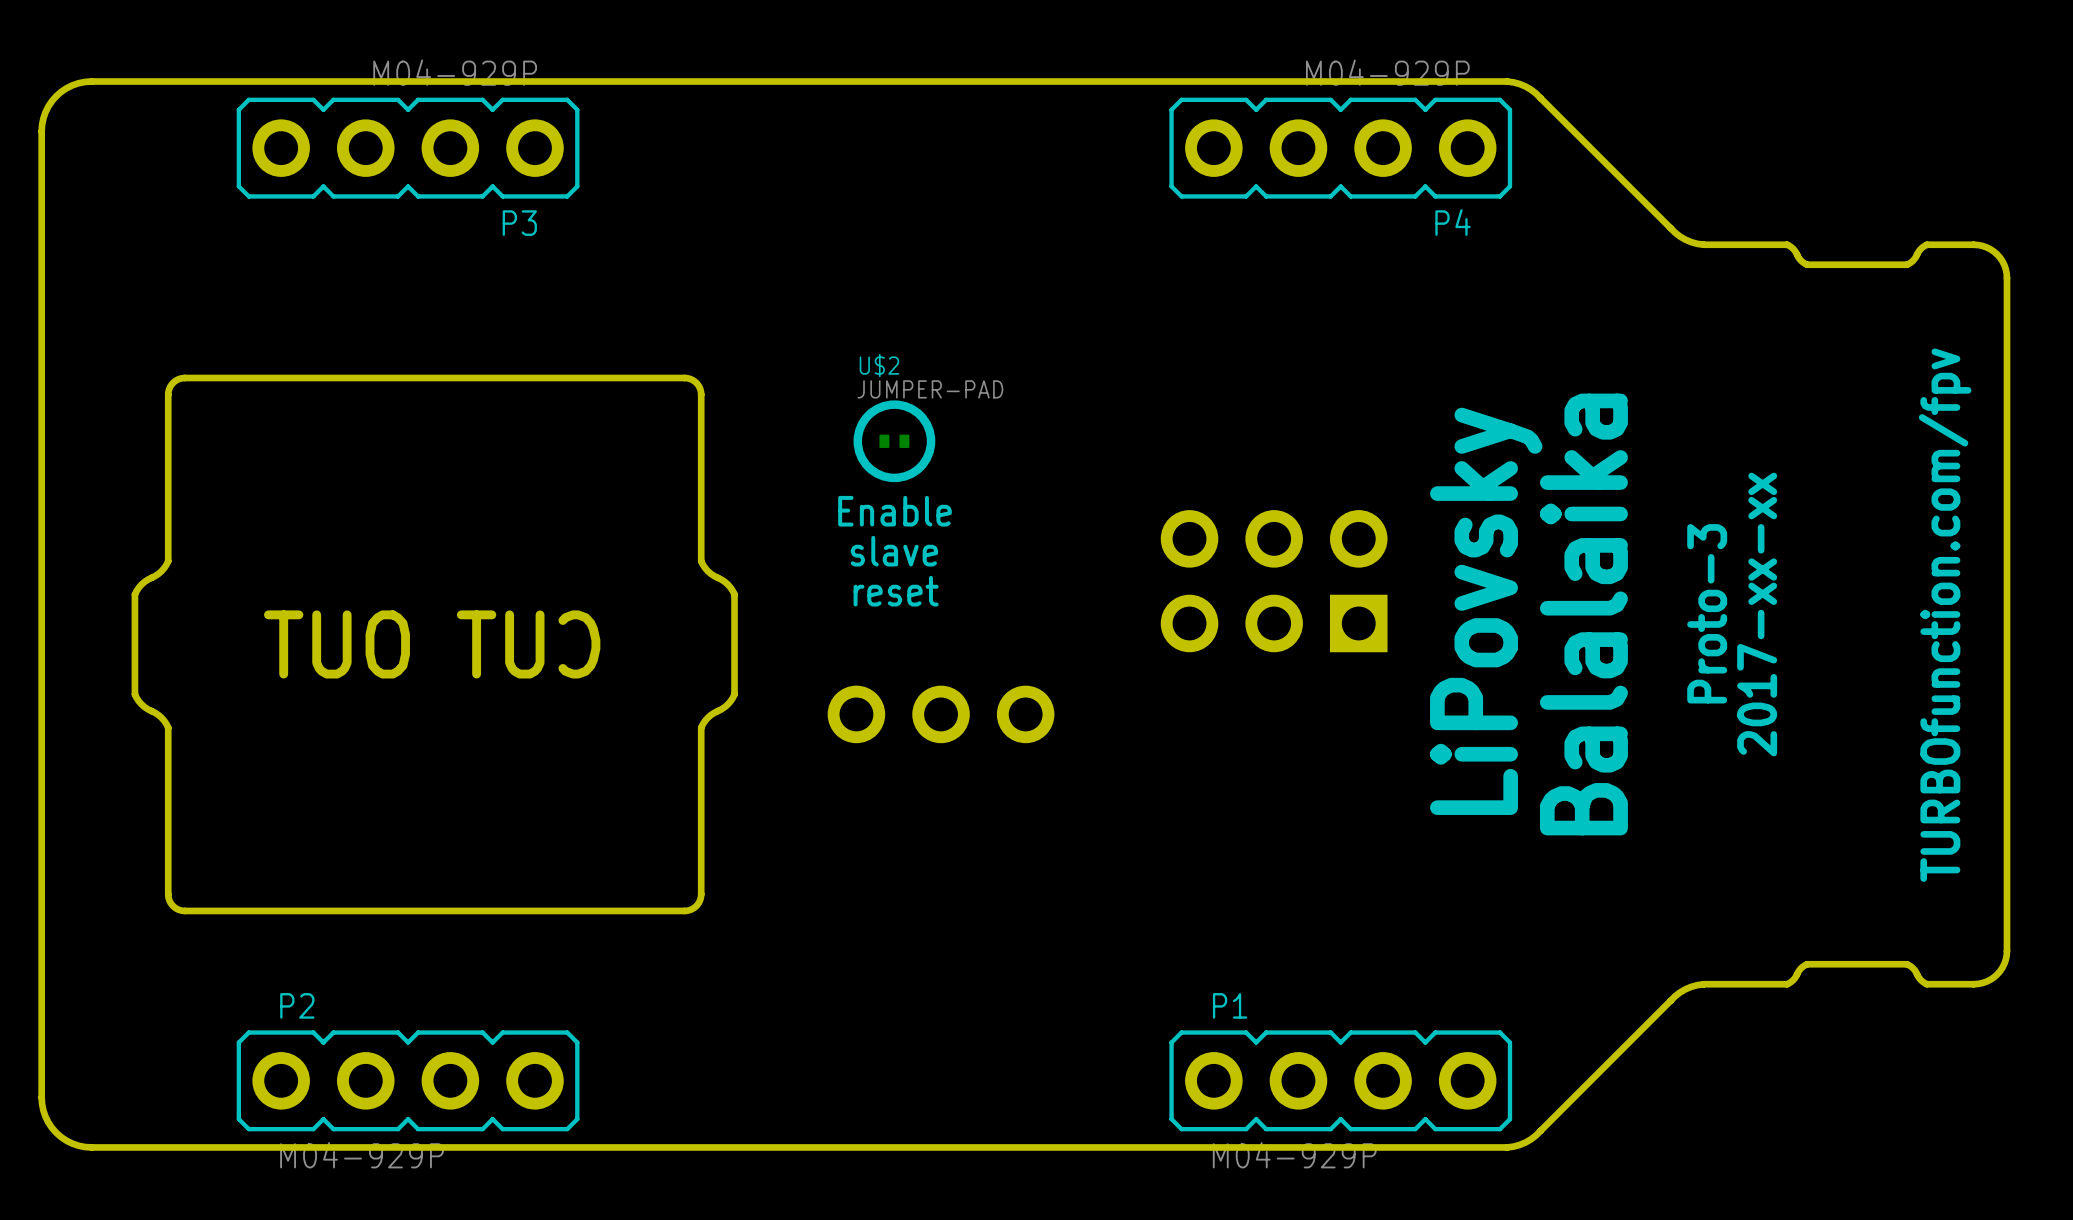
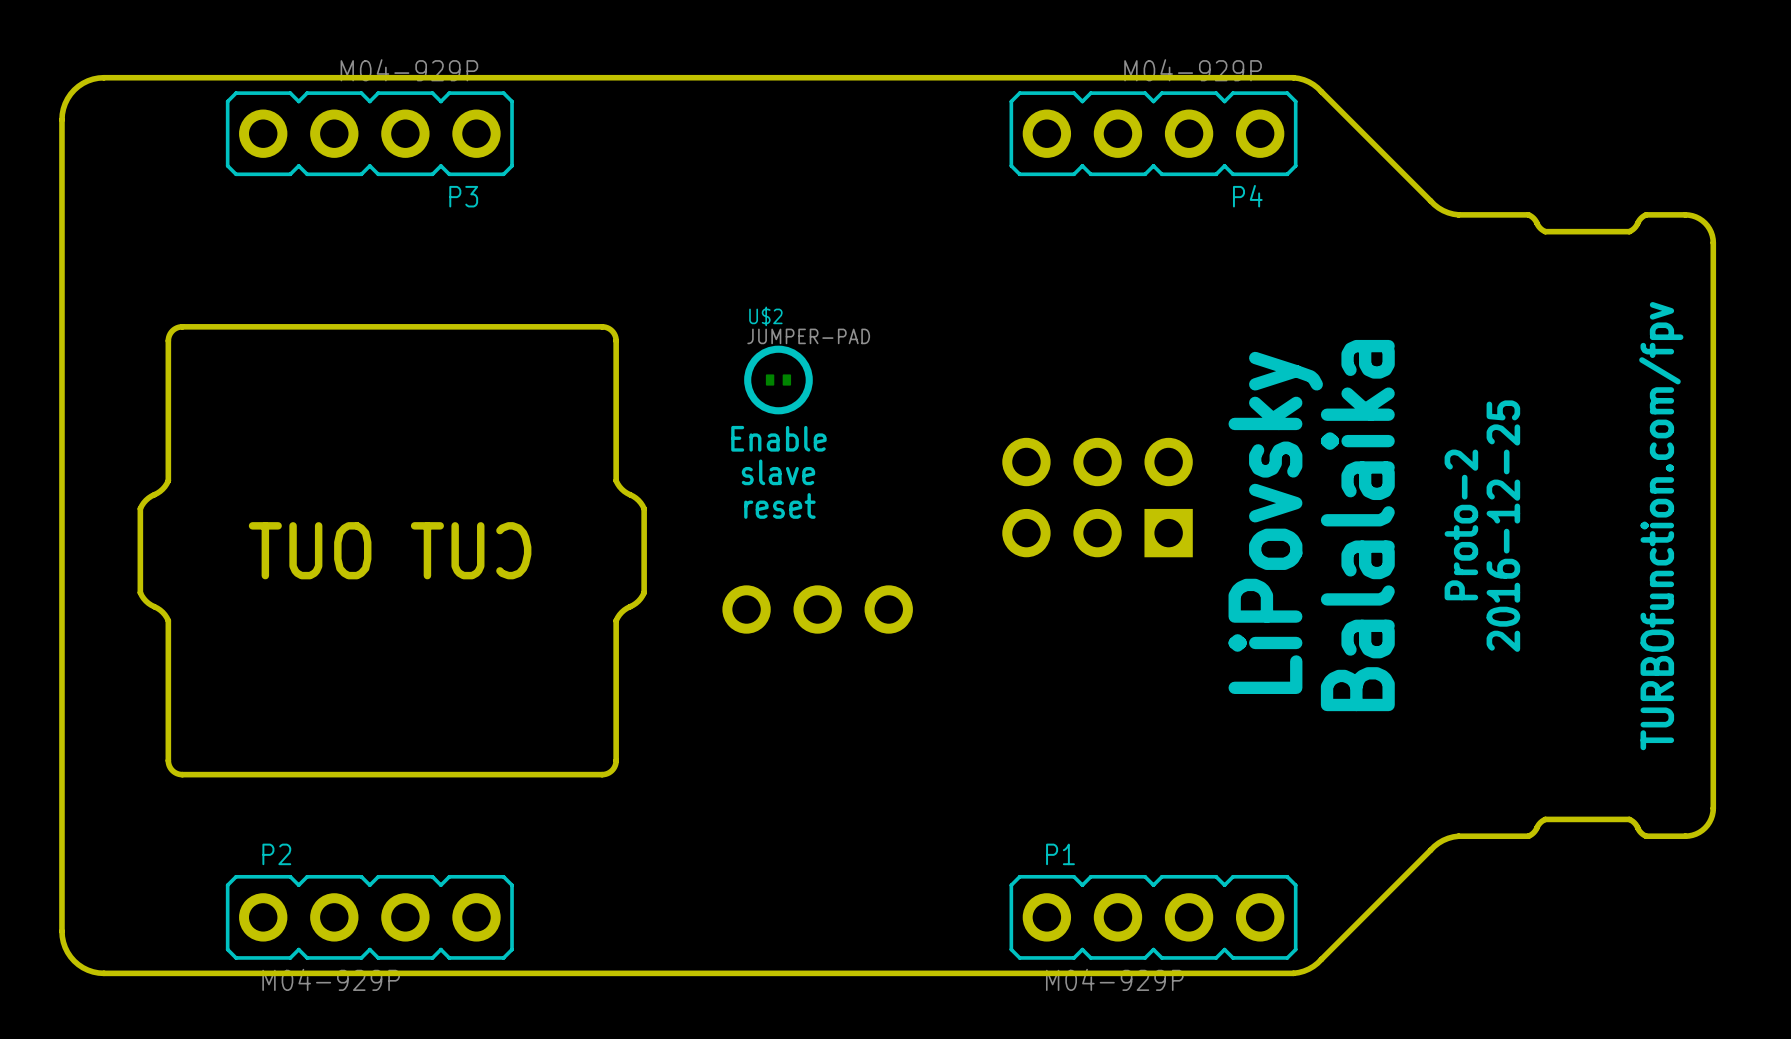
text: Proto-3 (1707, 613) -> Proto-2 (1461, 524)
text: 2017-xx-xx (1757, 614) -> 2016-12-25 (1503, 526)

